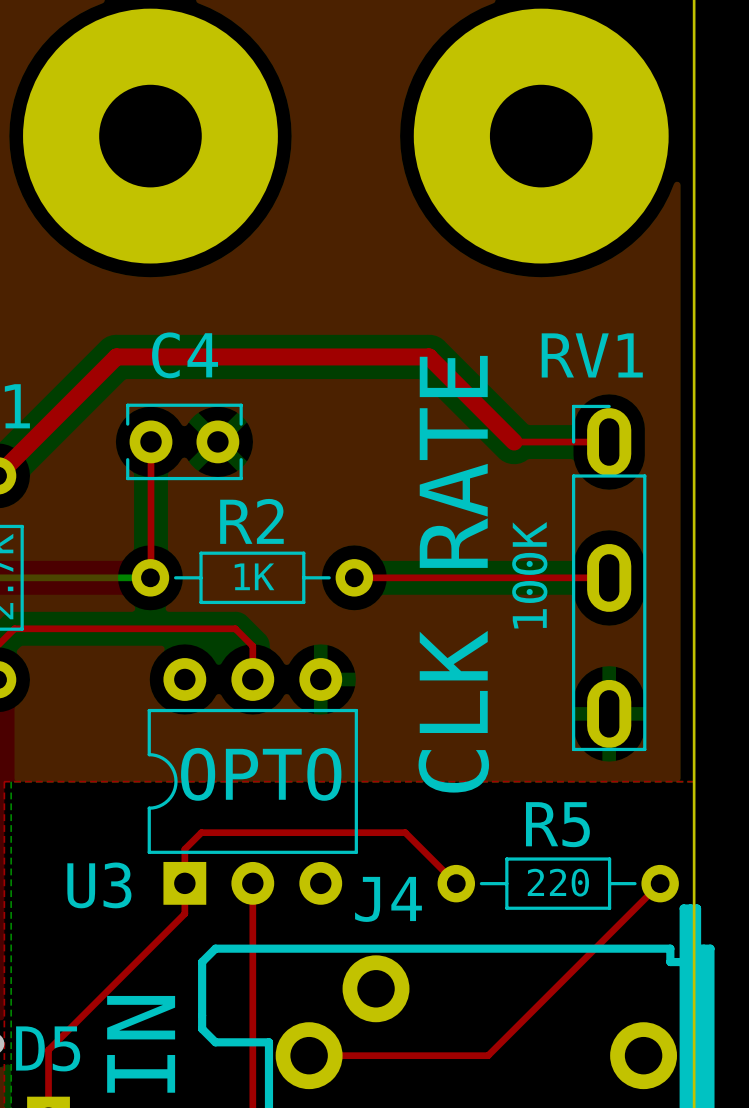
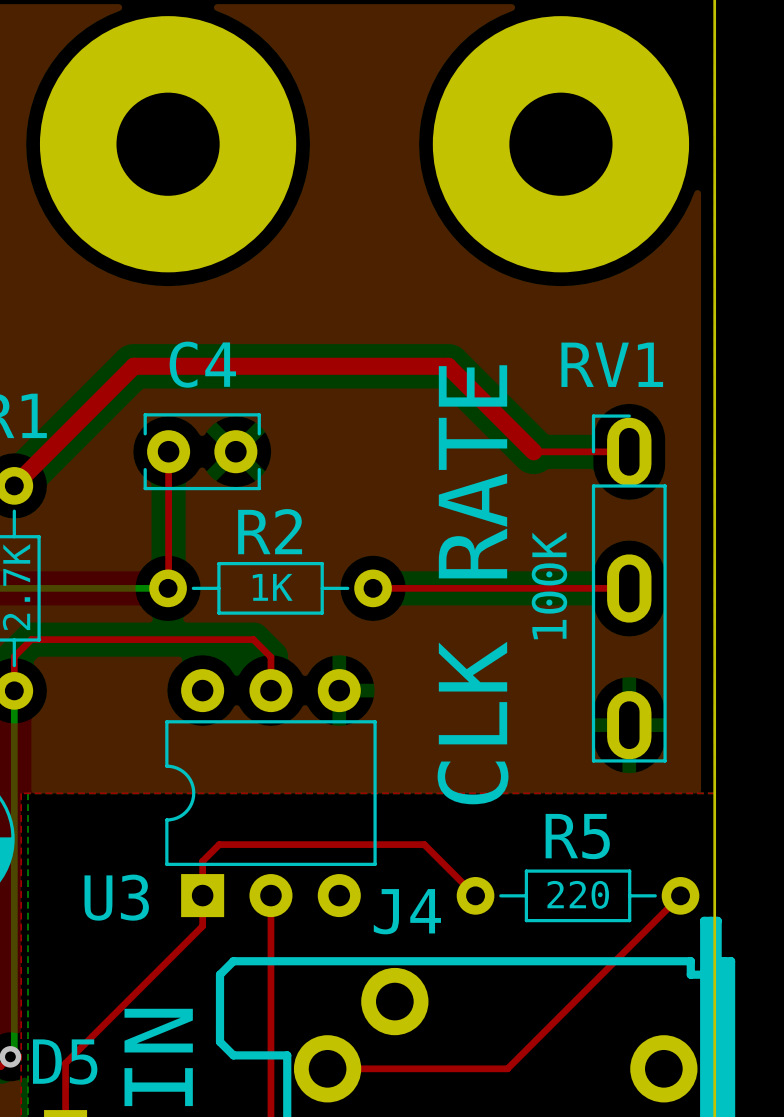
text: OPTO (261, 774) -> none

